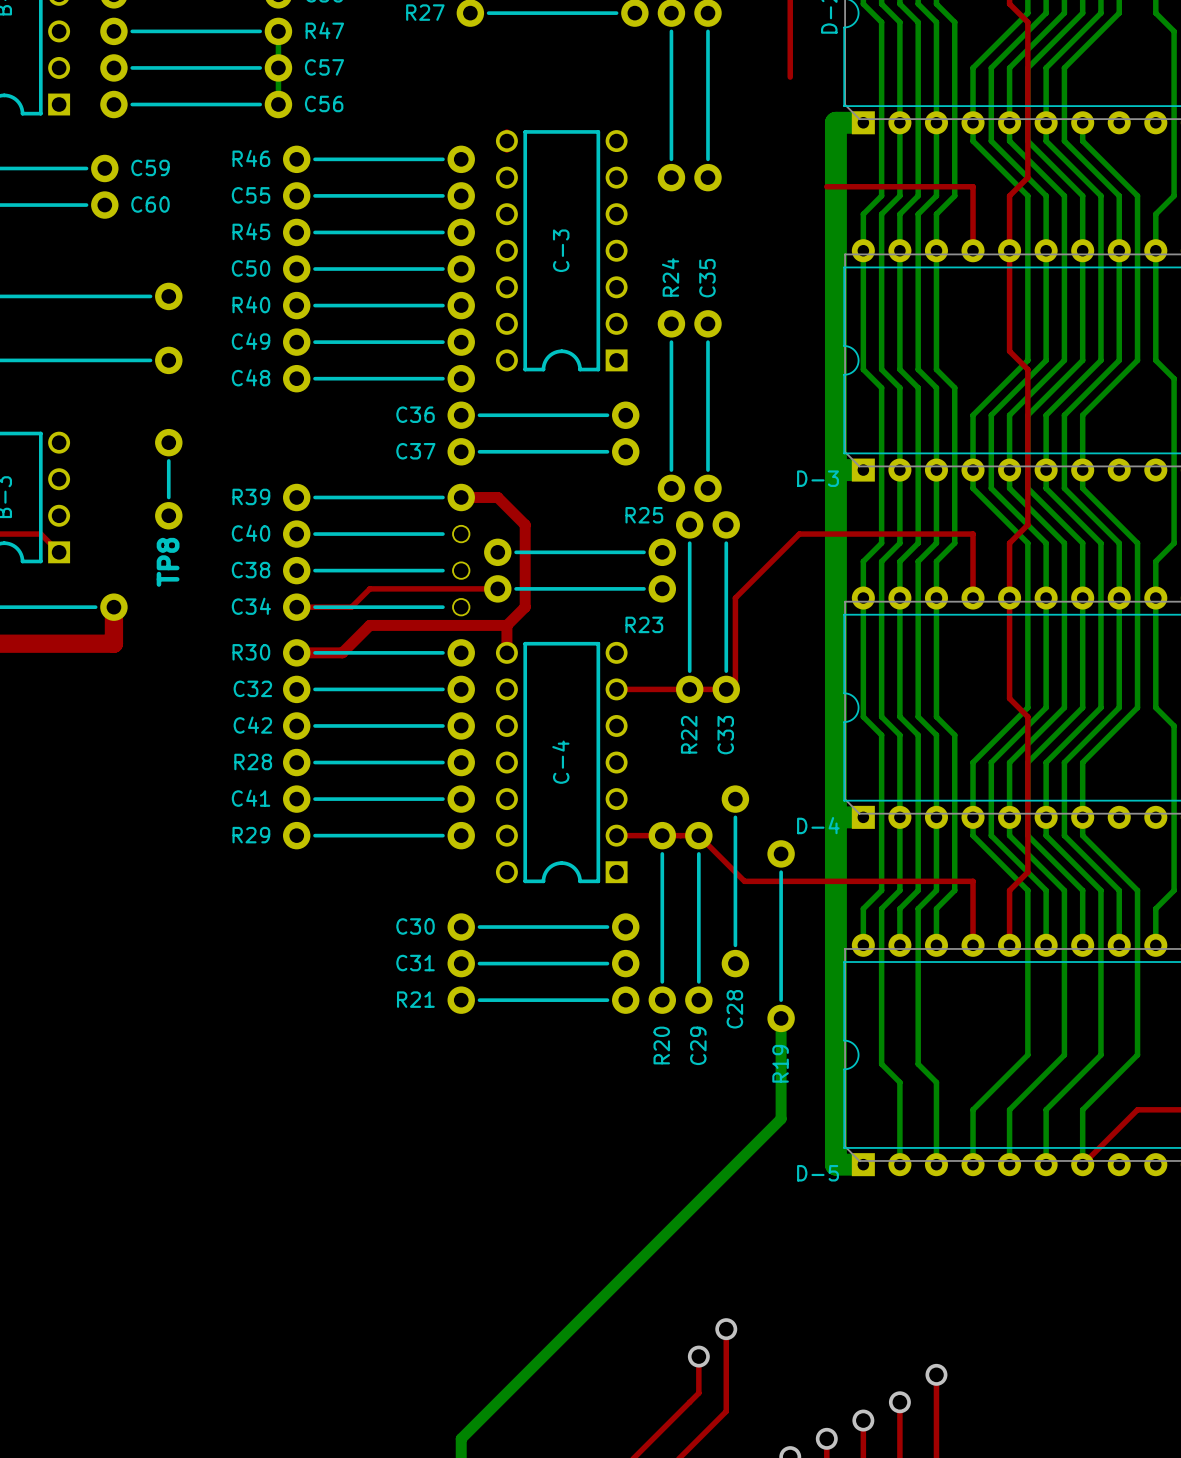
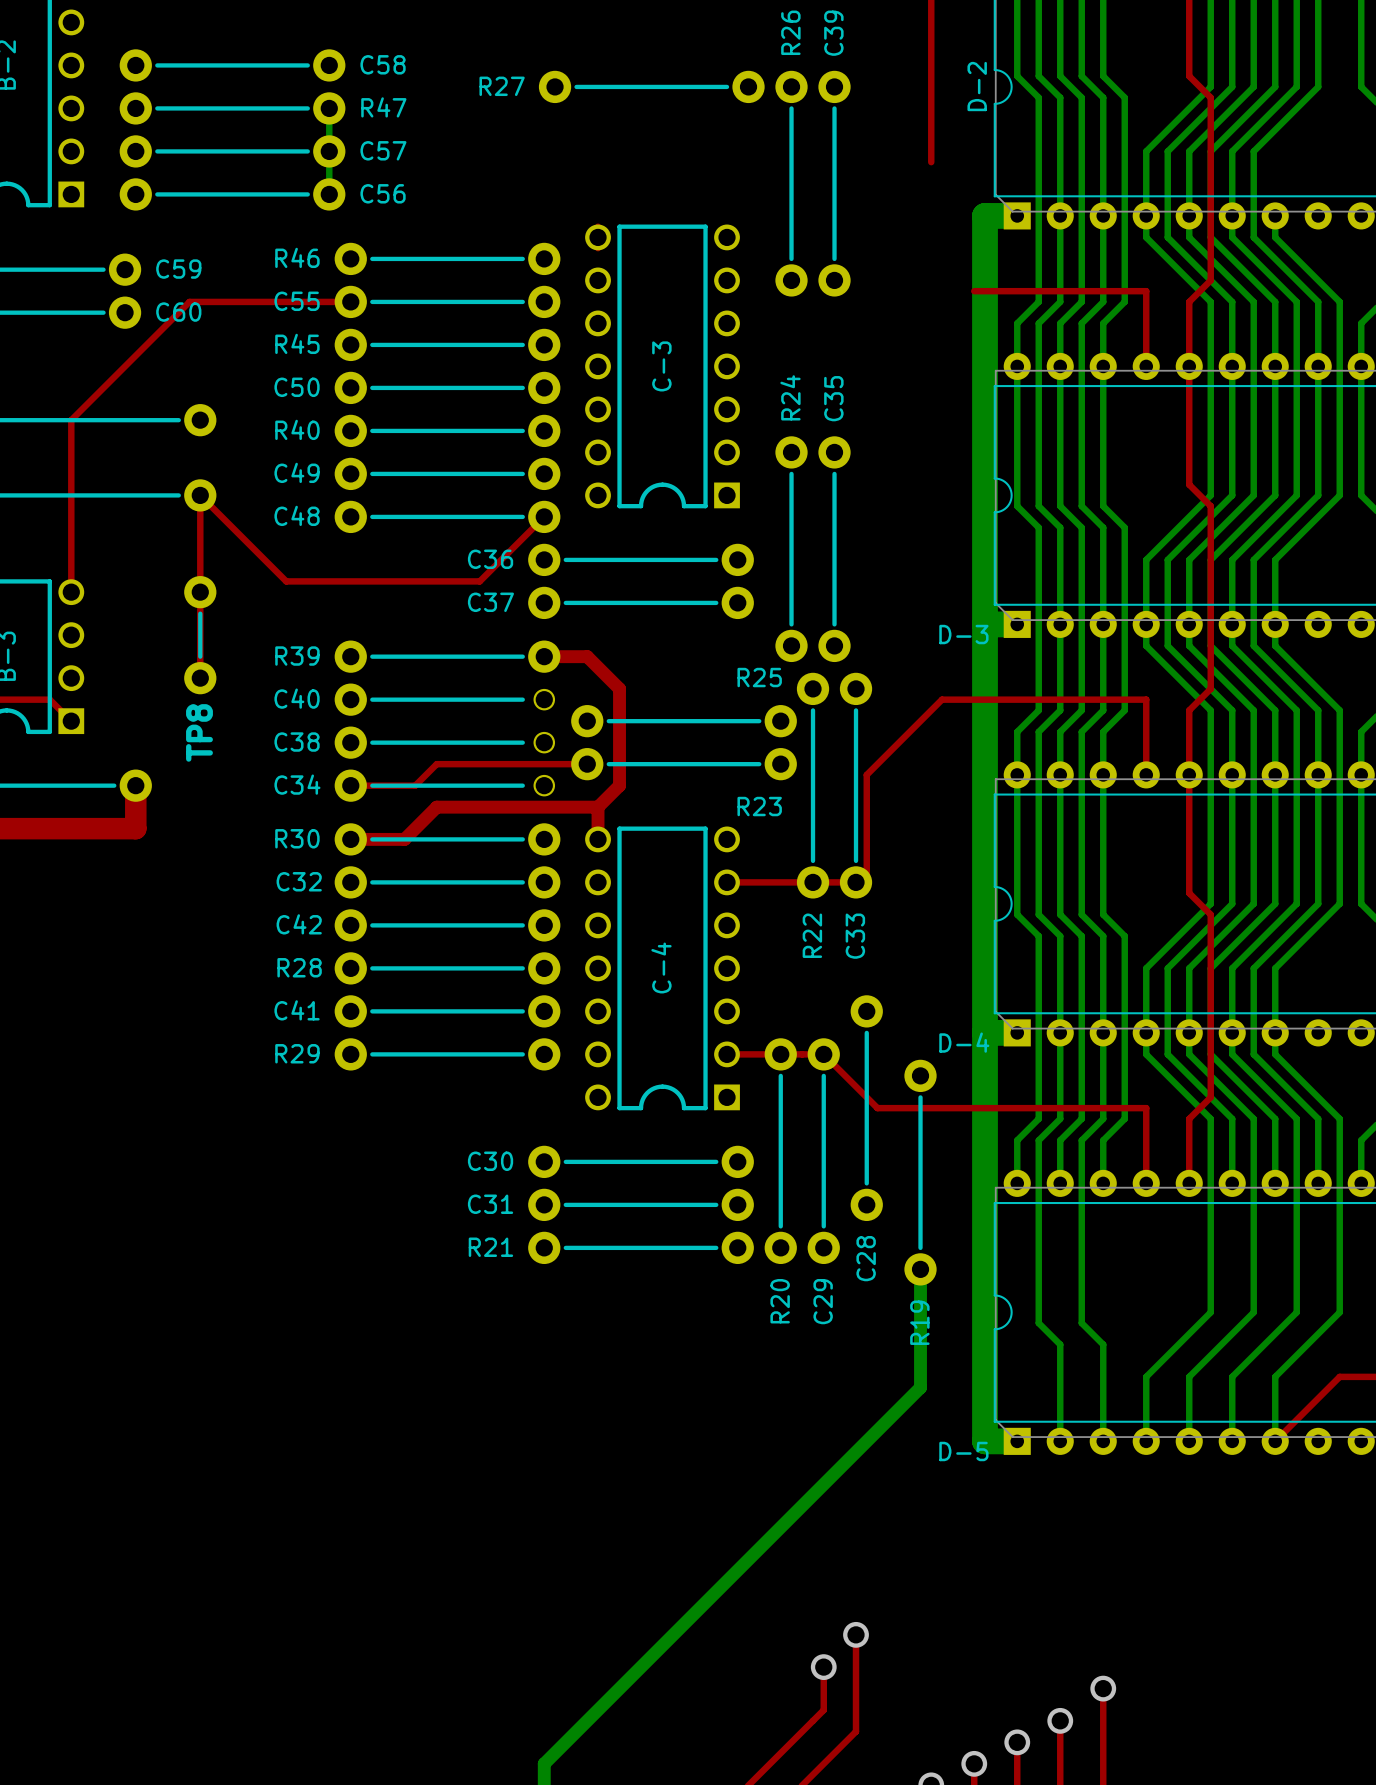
top track: none -> (350, 301) (189, 301) (71, 420) (71, 592)
top track: none -> (544, 516) (479, 581) (286, 581) (200, 495) (200, 678)

